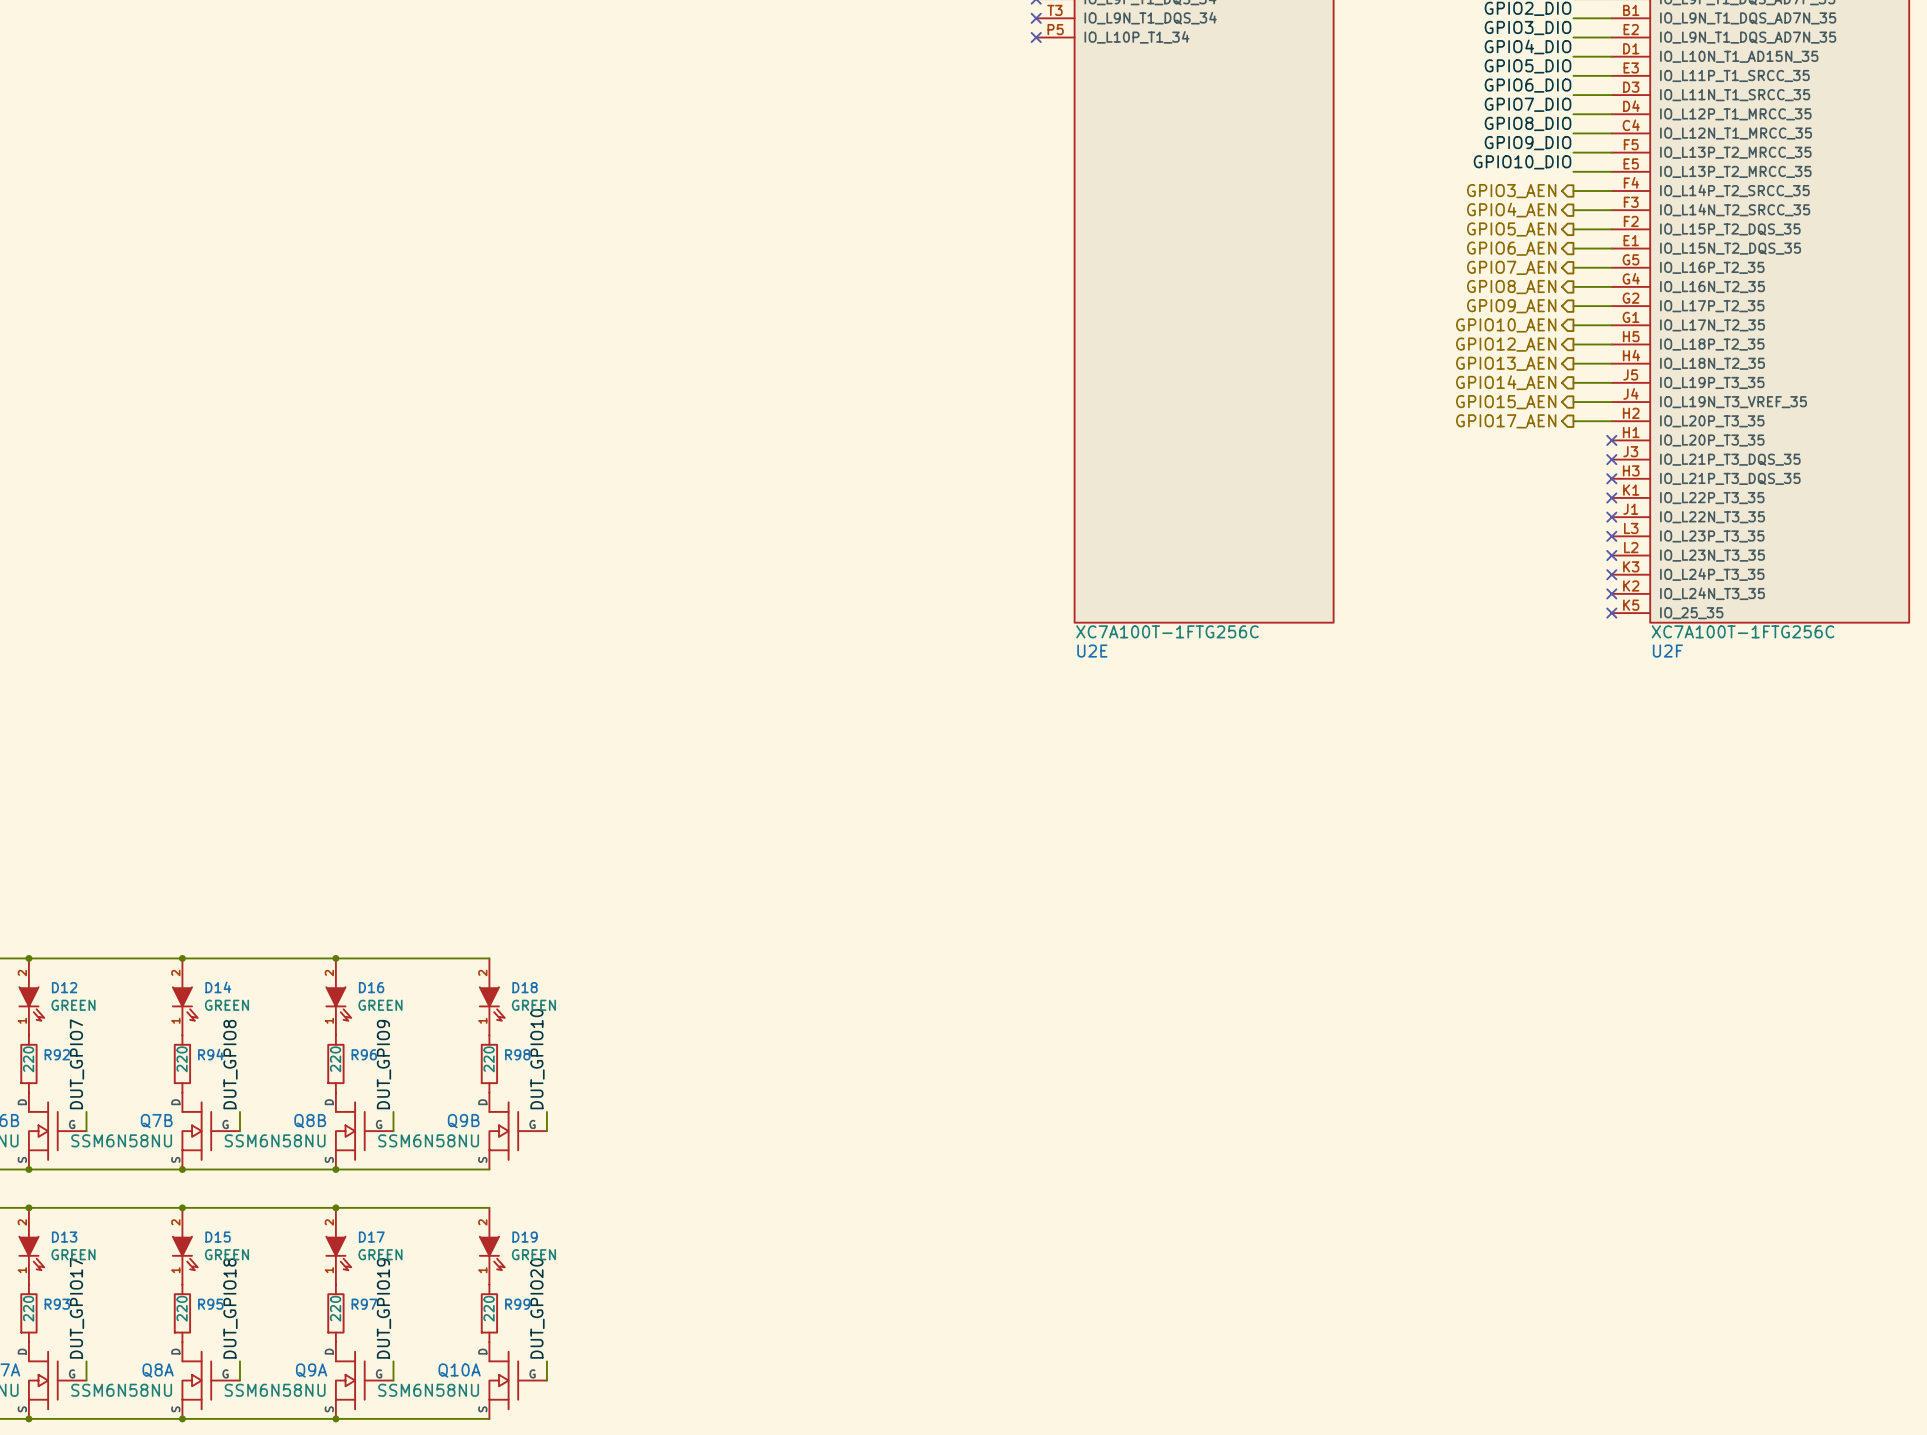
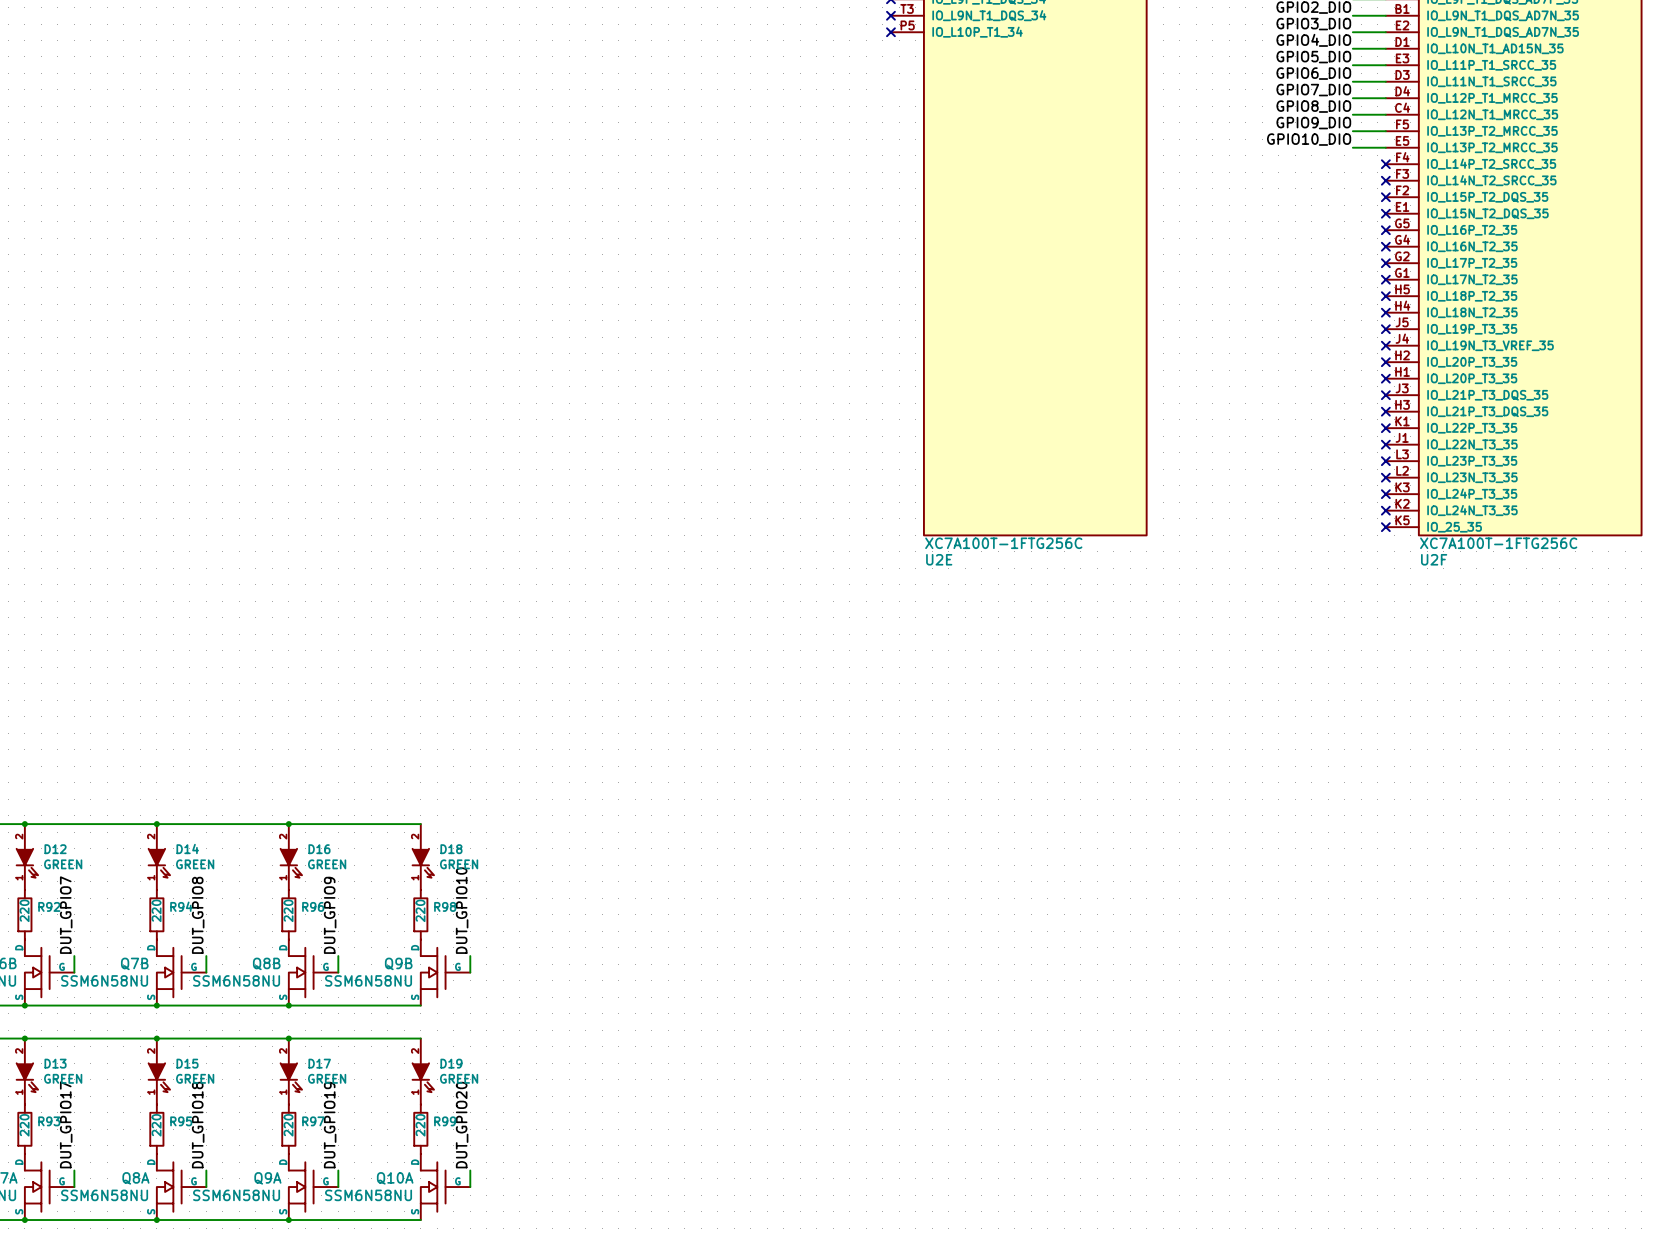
wire: (1573, 190) (1611, 190) -> none
no-connect mark: none -> (1385, 164)
hierarchical label: GPIO3_AEN (1511, 191) -> none
hierarchical label: GPIO4_AEN (1511, 210) -> none
wire: (1573, 210) (1611, 210) -> none
no-connect mark: none -> (1385, 180)
hierarchical label: GPIO5_AEN (1511, 229) -> none
wire: (1573, 229) (1611, 229) -> none
no-connect mark: none -> (1385, 197)
hierarchical label: GPIO6_AEN (1511, 248) -> none
wire: (1573, 248) (1611, 248) -> none
no-connect mark: none -> (1385, 213)
hierarchical label: GPIO7_AEN (1511, 267) -> none
wire: (1573, 267) (1611, 267) -> none
no-connect mark: none -> (1385, 230)
wire: (1573, 286) (1611, 286) -> none
no-connect mark: none -> (1385, 246)
hierarchical label: GPIO8_AEN (1511, 287) -> none
hierarchical label: GPIO9_AEN (1511, 306) -> none
wire: (1573, 306) (1611, 306) -> none
no-connect mark: none -> (1385, 263)
hierarchical label: GPIO10_AEN (1506, 325) -> none
wire: (1573, 325) (1611, 325) -> none
no-connect mark: none -> (1385, 279)
hierarchical label: GPIO12_AEN (1506, 344) -> none
wire: (1573, 344) (1611, 344) -> none
no-connect mark: none -> (1385, 296)
hierarchical label: GPIO13_AEN (1506, 363) -> none
wire: (1573, 363) (1611, 363) -> none
no-connect mark: none -> (1385, 312)
hierarchical label: GPIO14_AEN (1506, 382) -> none
wire: (1573, 382) (1611, 382) -> none
no-connect mark: none -> (1385, 329)
hierarchical label: GPIO15_AEN (1506, 402) -> none
wire: (1573, 402) (1611, 402) -> none
no-connect mark: none -> (1385, 345)
hierarchical label: GPIO17_AEN (1506, 421) -> none
wire: (1573, 421) (1611, 421) -> none
no-connect mark: none -> (1385, 362)

